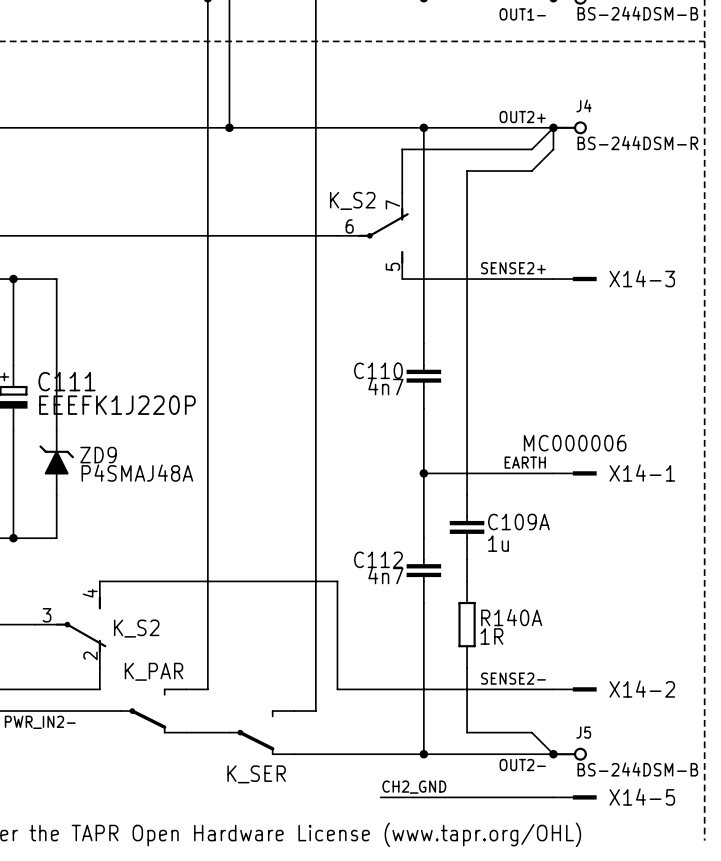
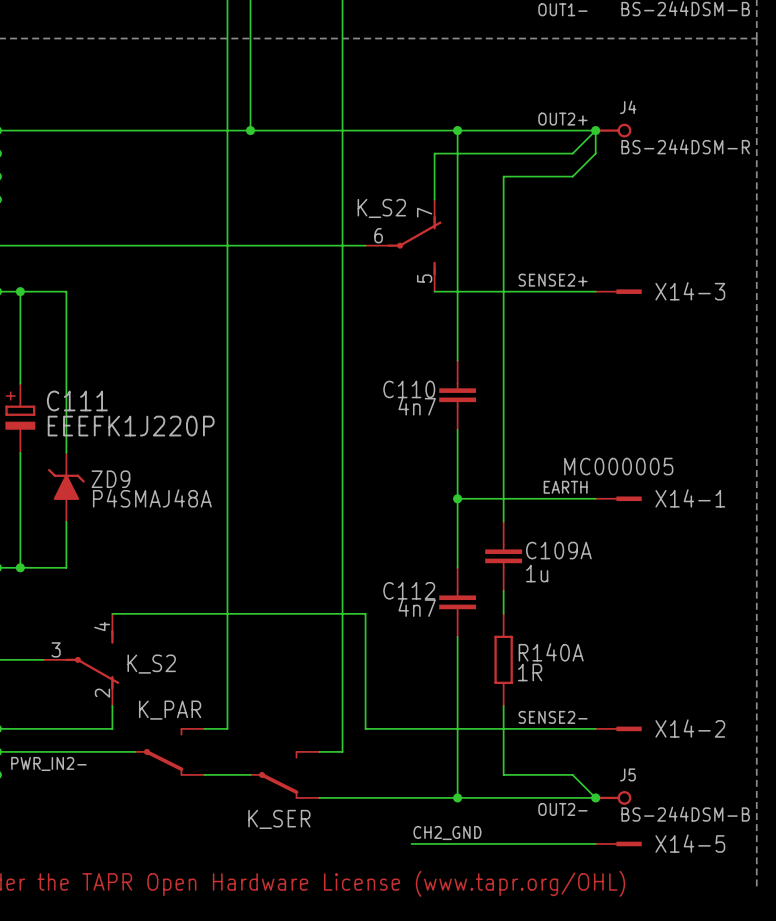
X14-1 value: MC000006 (575, 443) -> MC000005 (618, 466)

